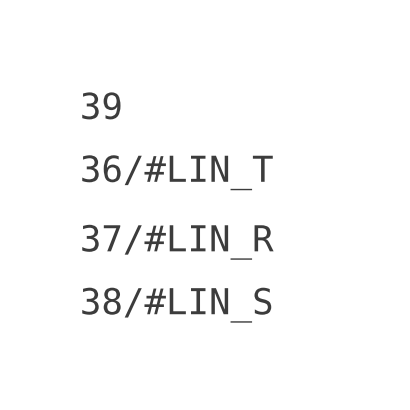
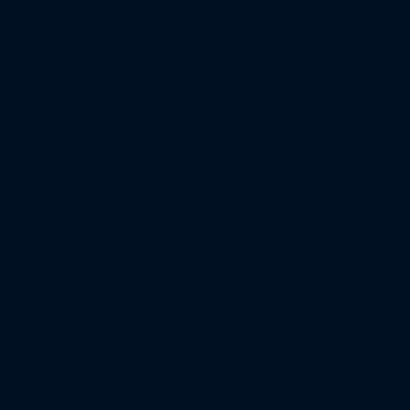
text: 39 (101, 105) -> none
text: 36/#LIN_T (177, 172) -> none
text: 37/#LIN_R (177, 242) -> none
text: 38/#LIN_S (176, 305) -> none

